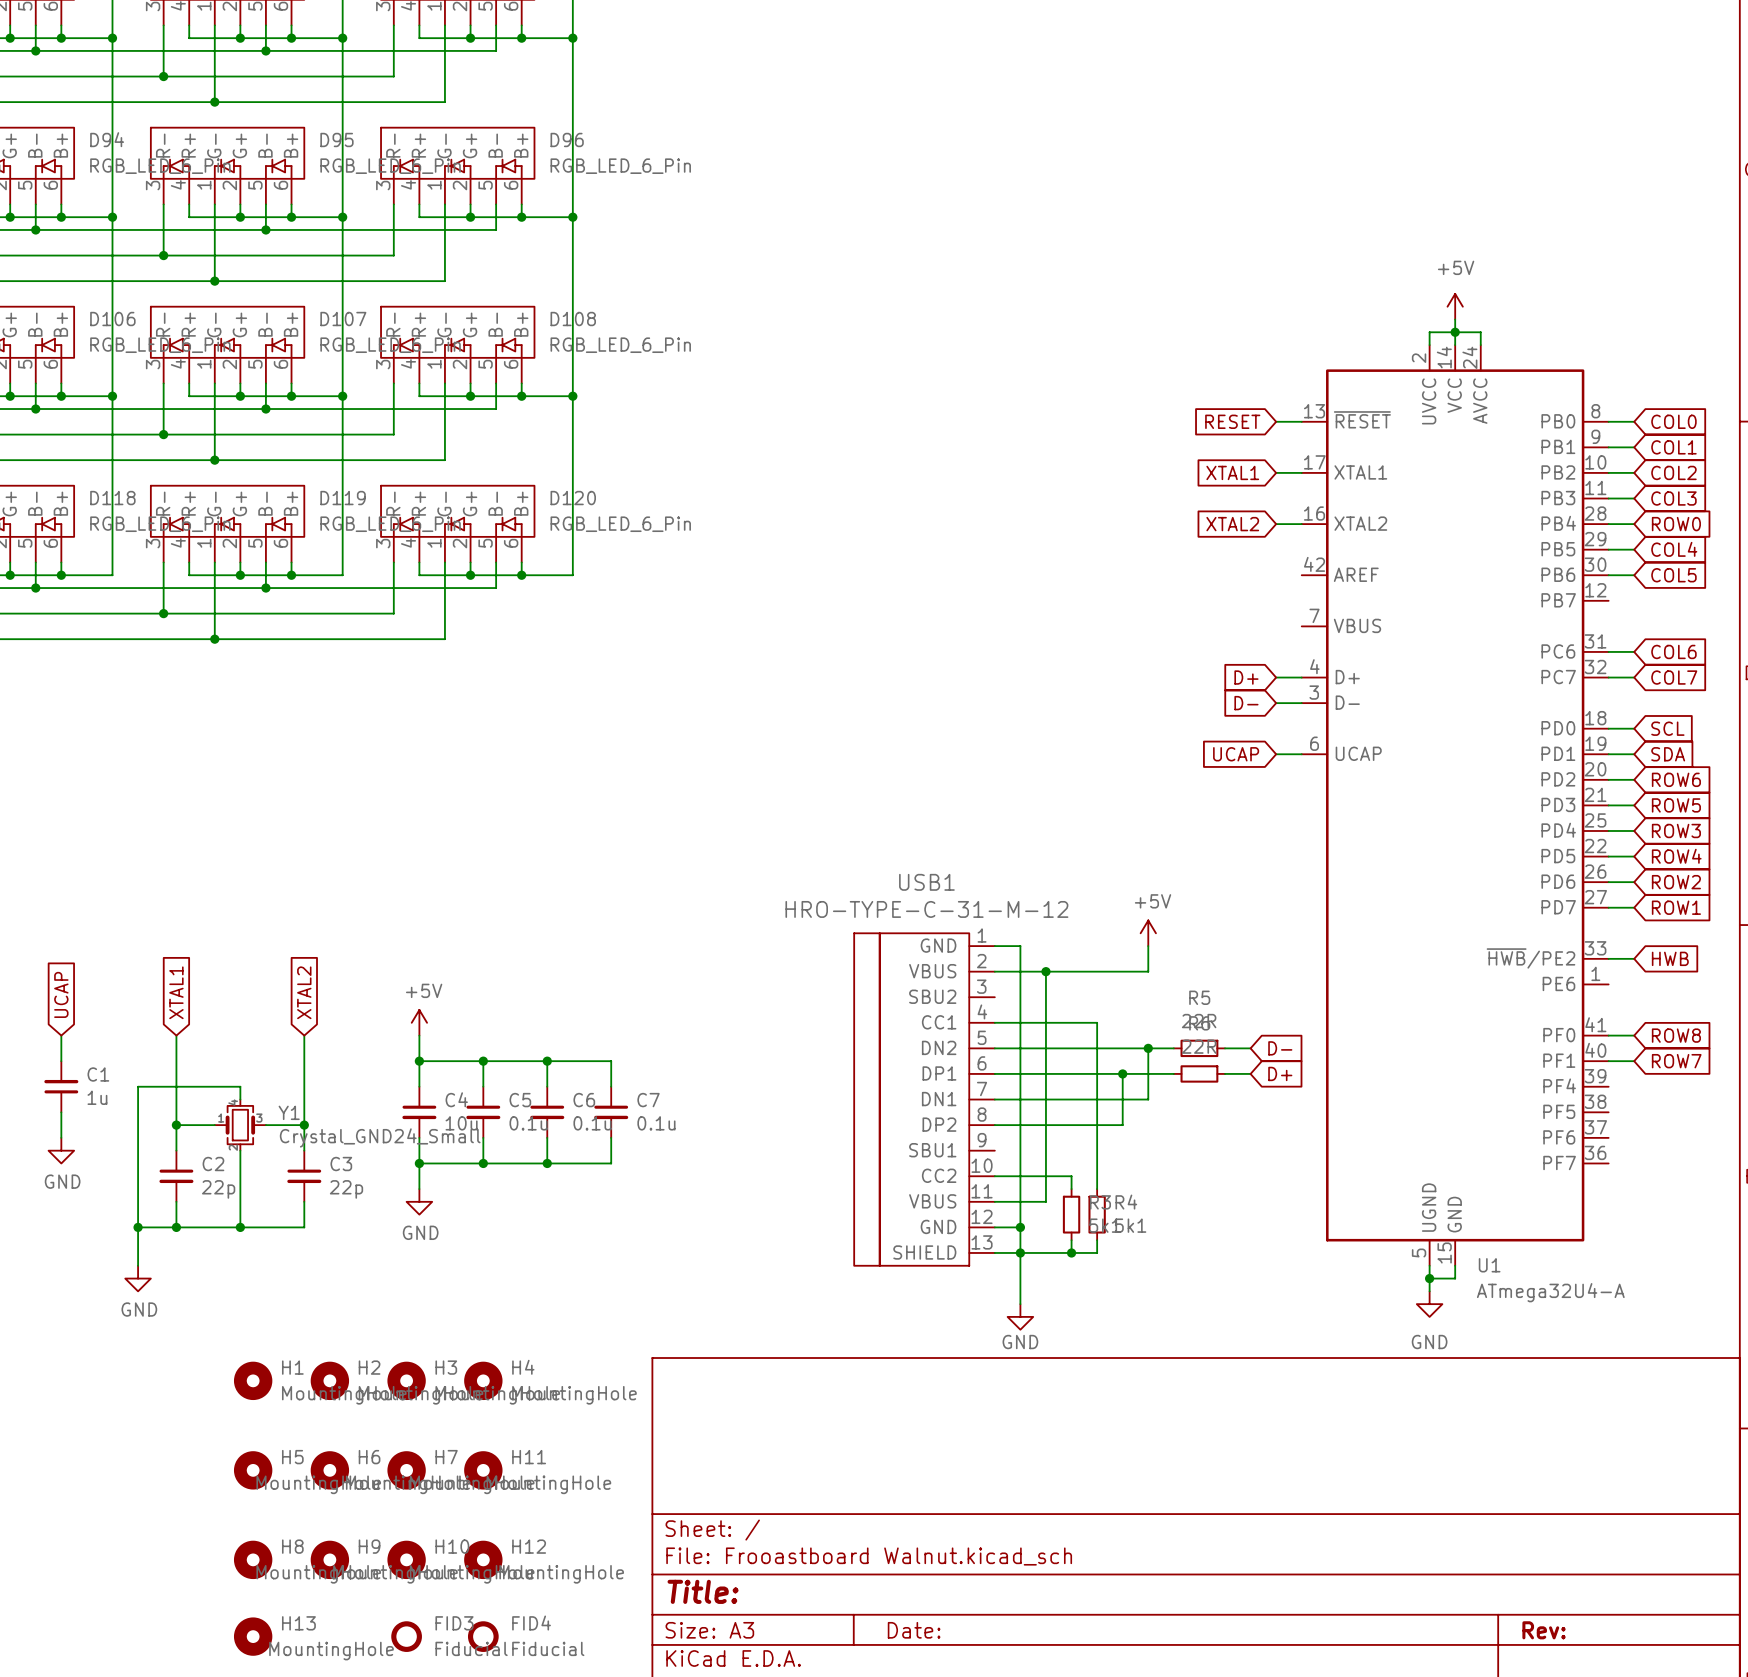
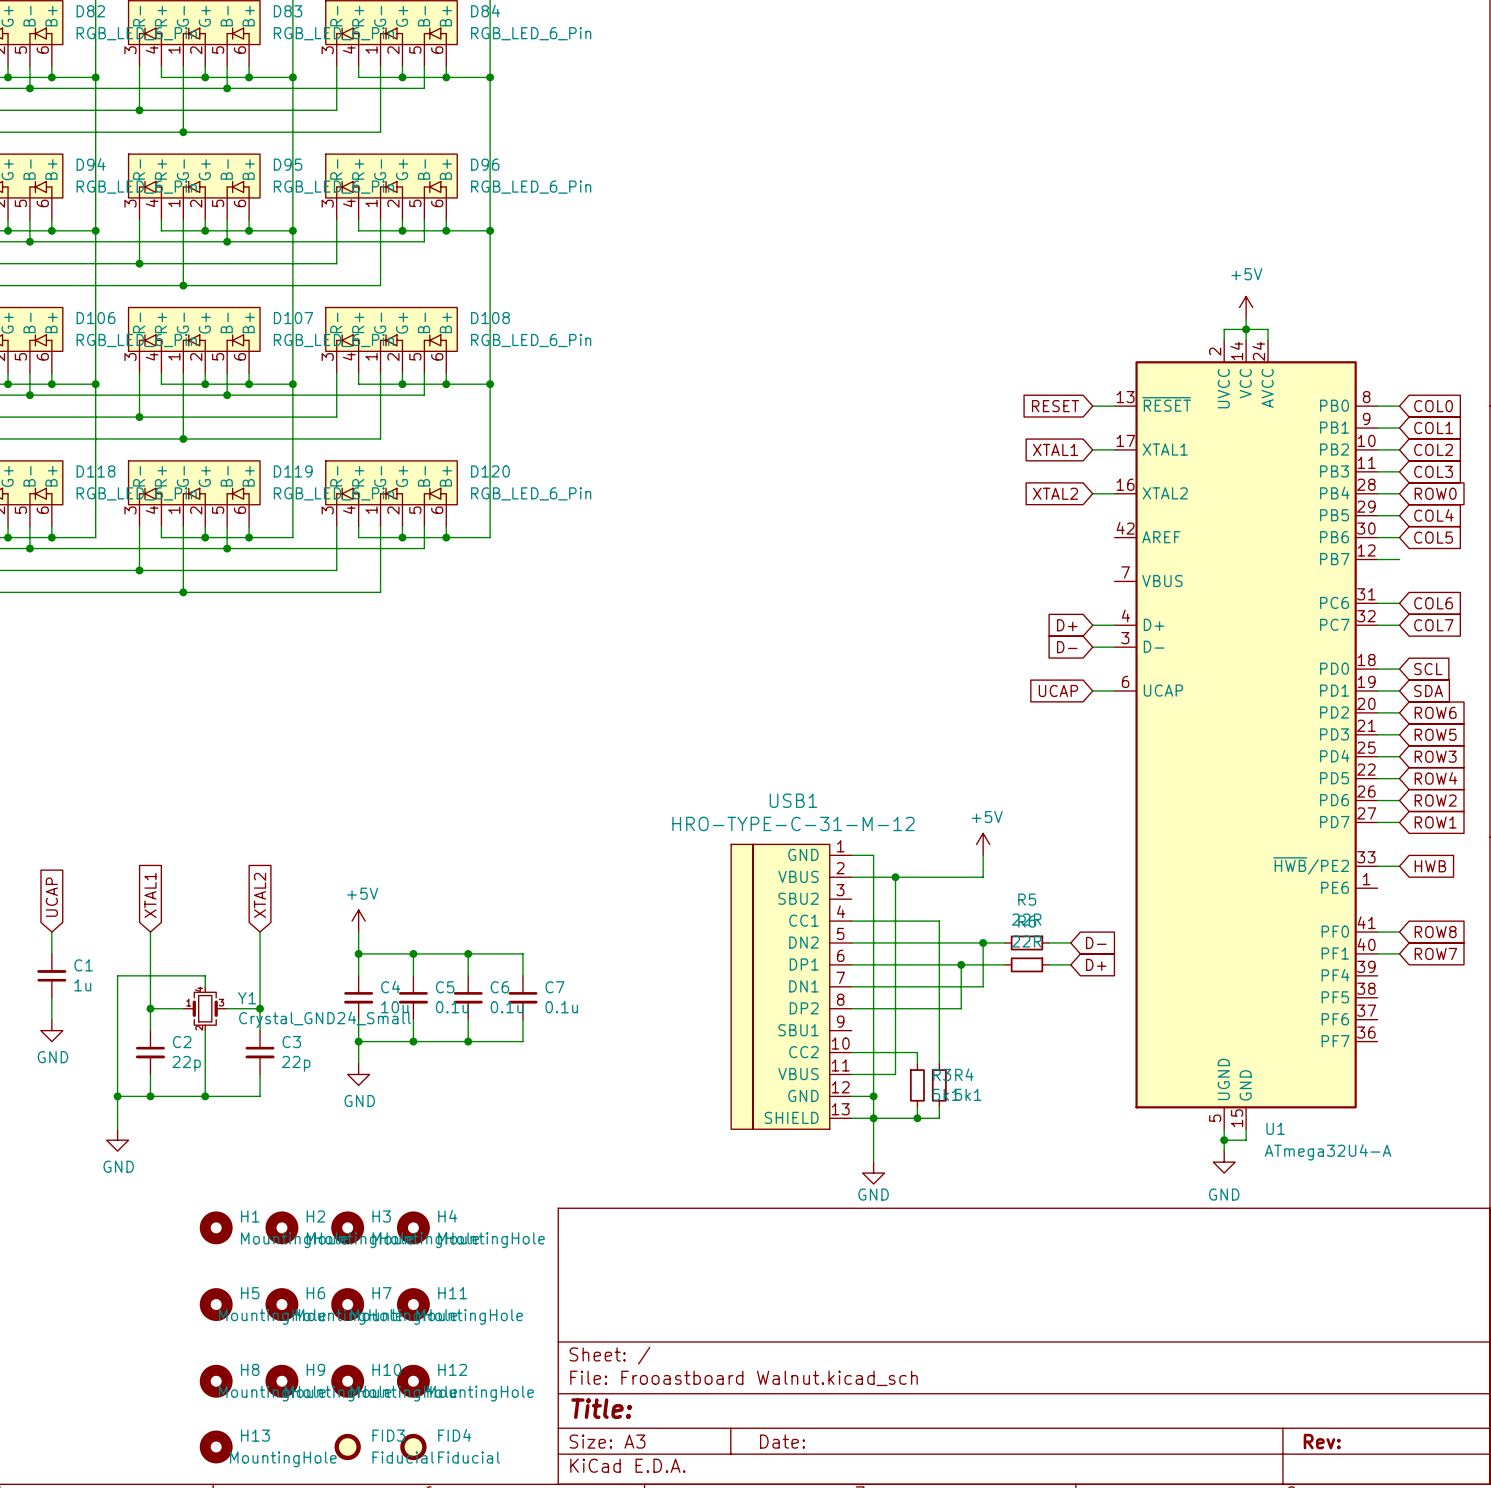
wire: none -> (1377, 559) (1399, 559)

